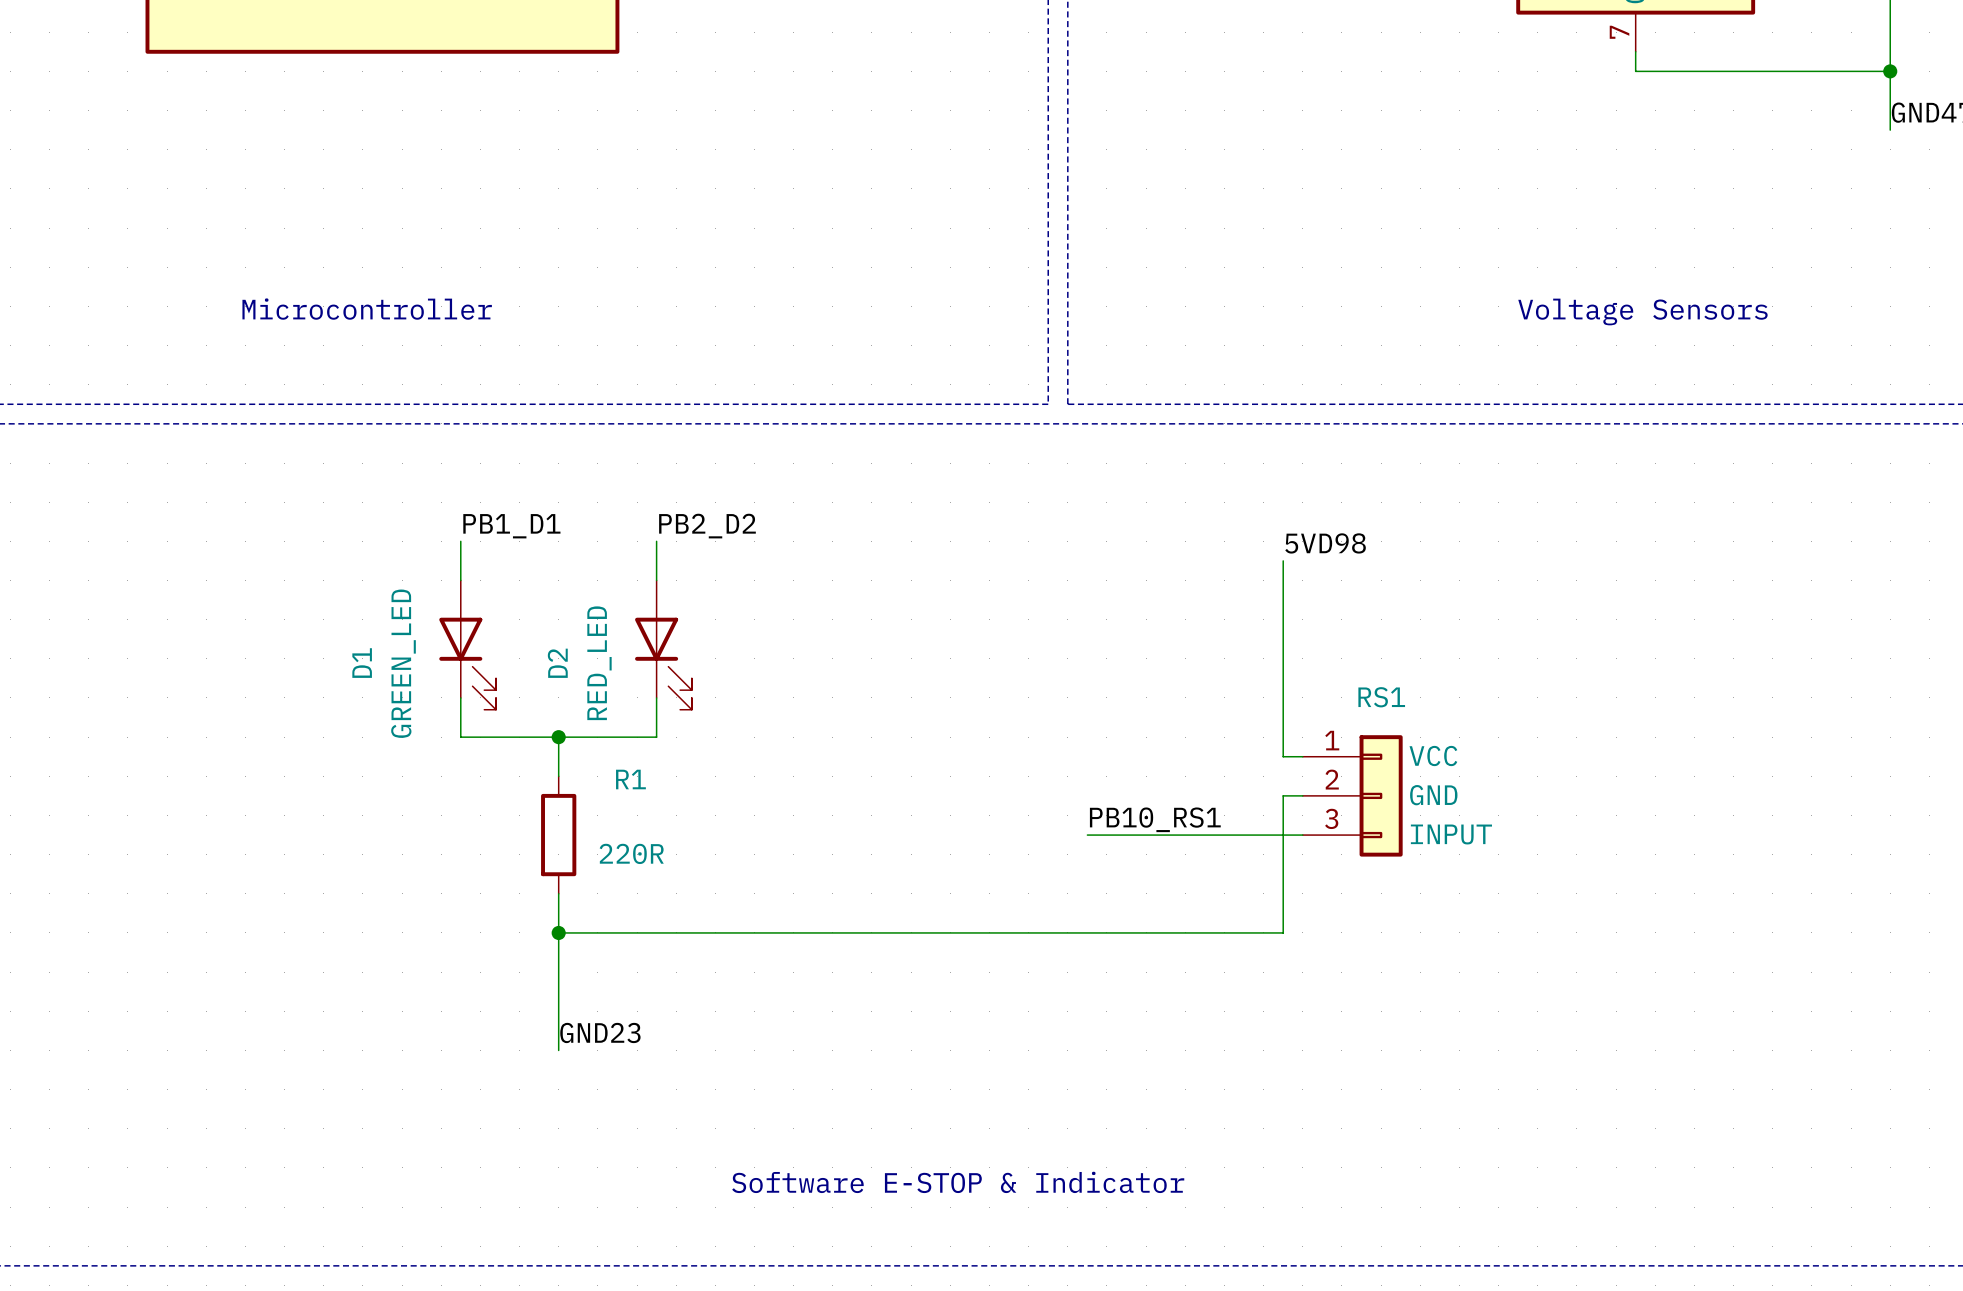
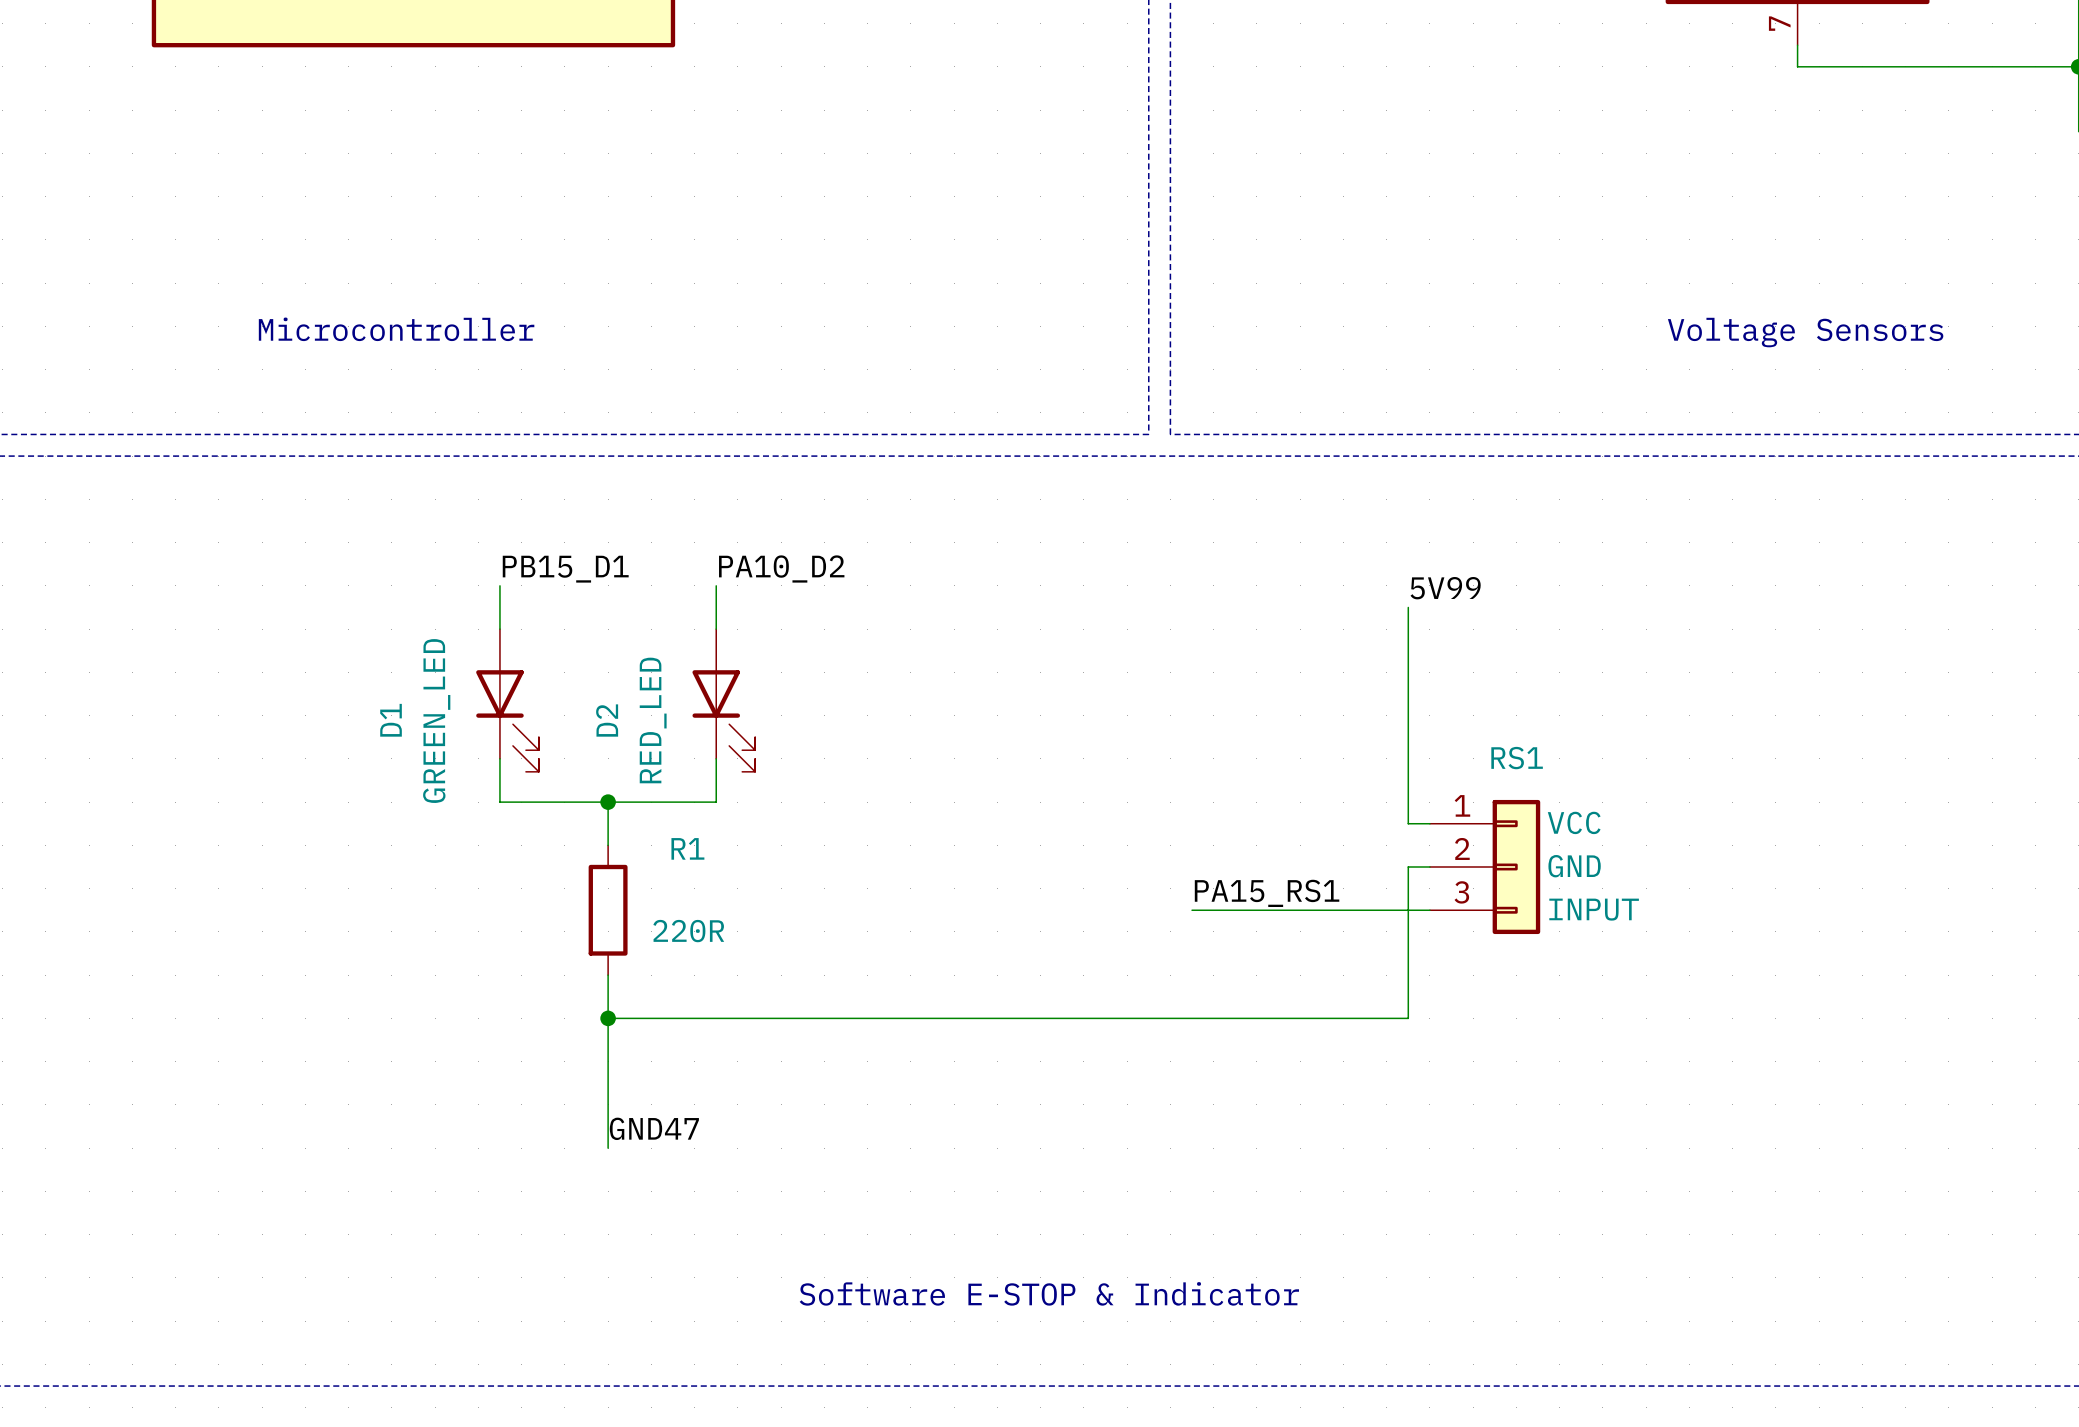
label: PB1_D1 (511, 526) -> PB15_D1 (565, 569)
label: PB2_D2 (707, 526) -> PA10_D2 (781, 568)
label: 5VD98 (1325, 543) -> 5V99 (1445, 588)
label: PB10_RS1 (1155, 819) -> PA15_RS1 (1267, 893)
label: GND23 (600, 1032) -> GND47 (654, 1128)

